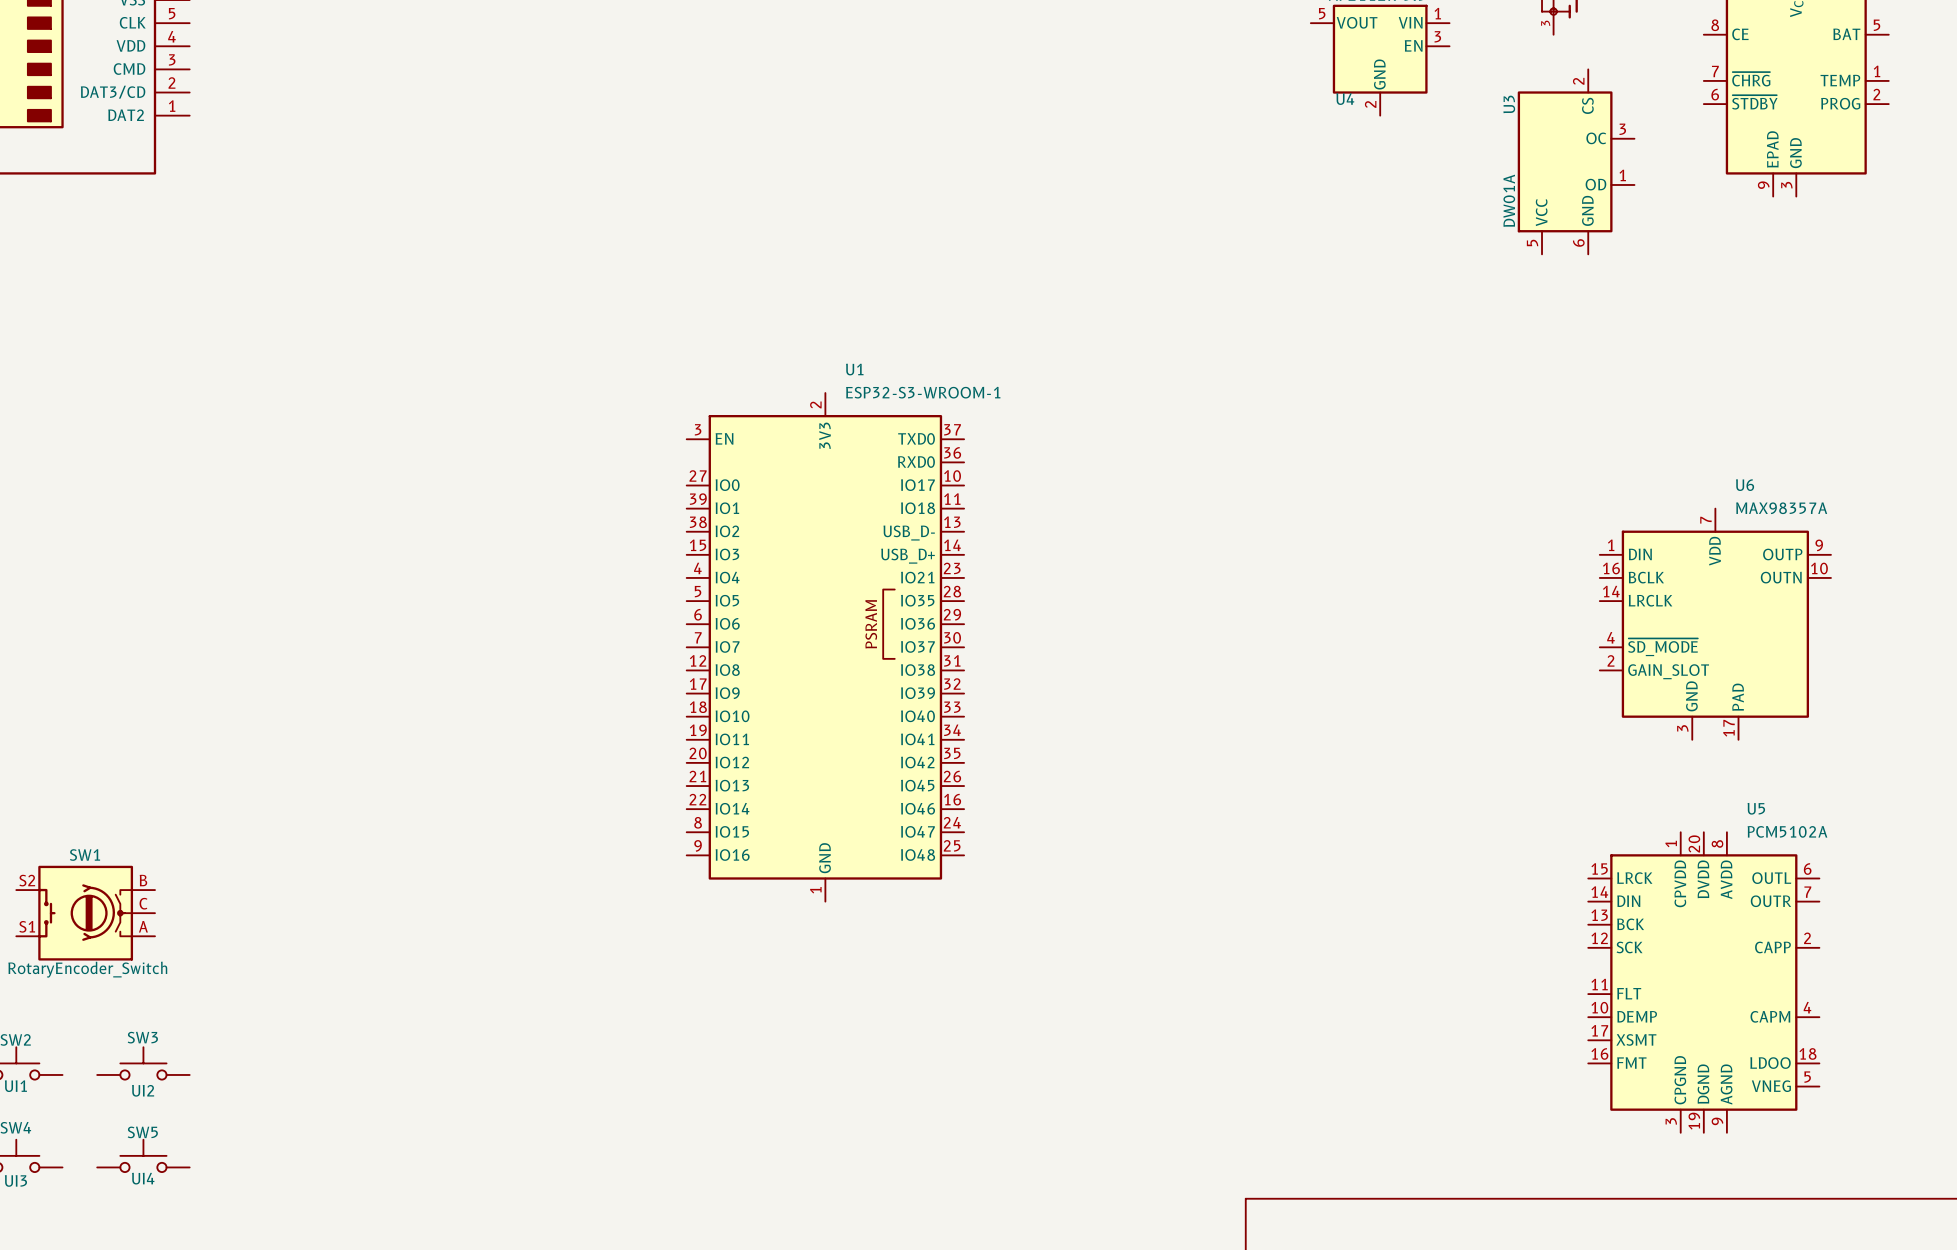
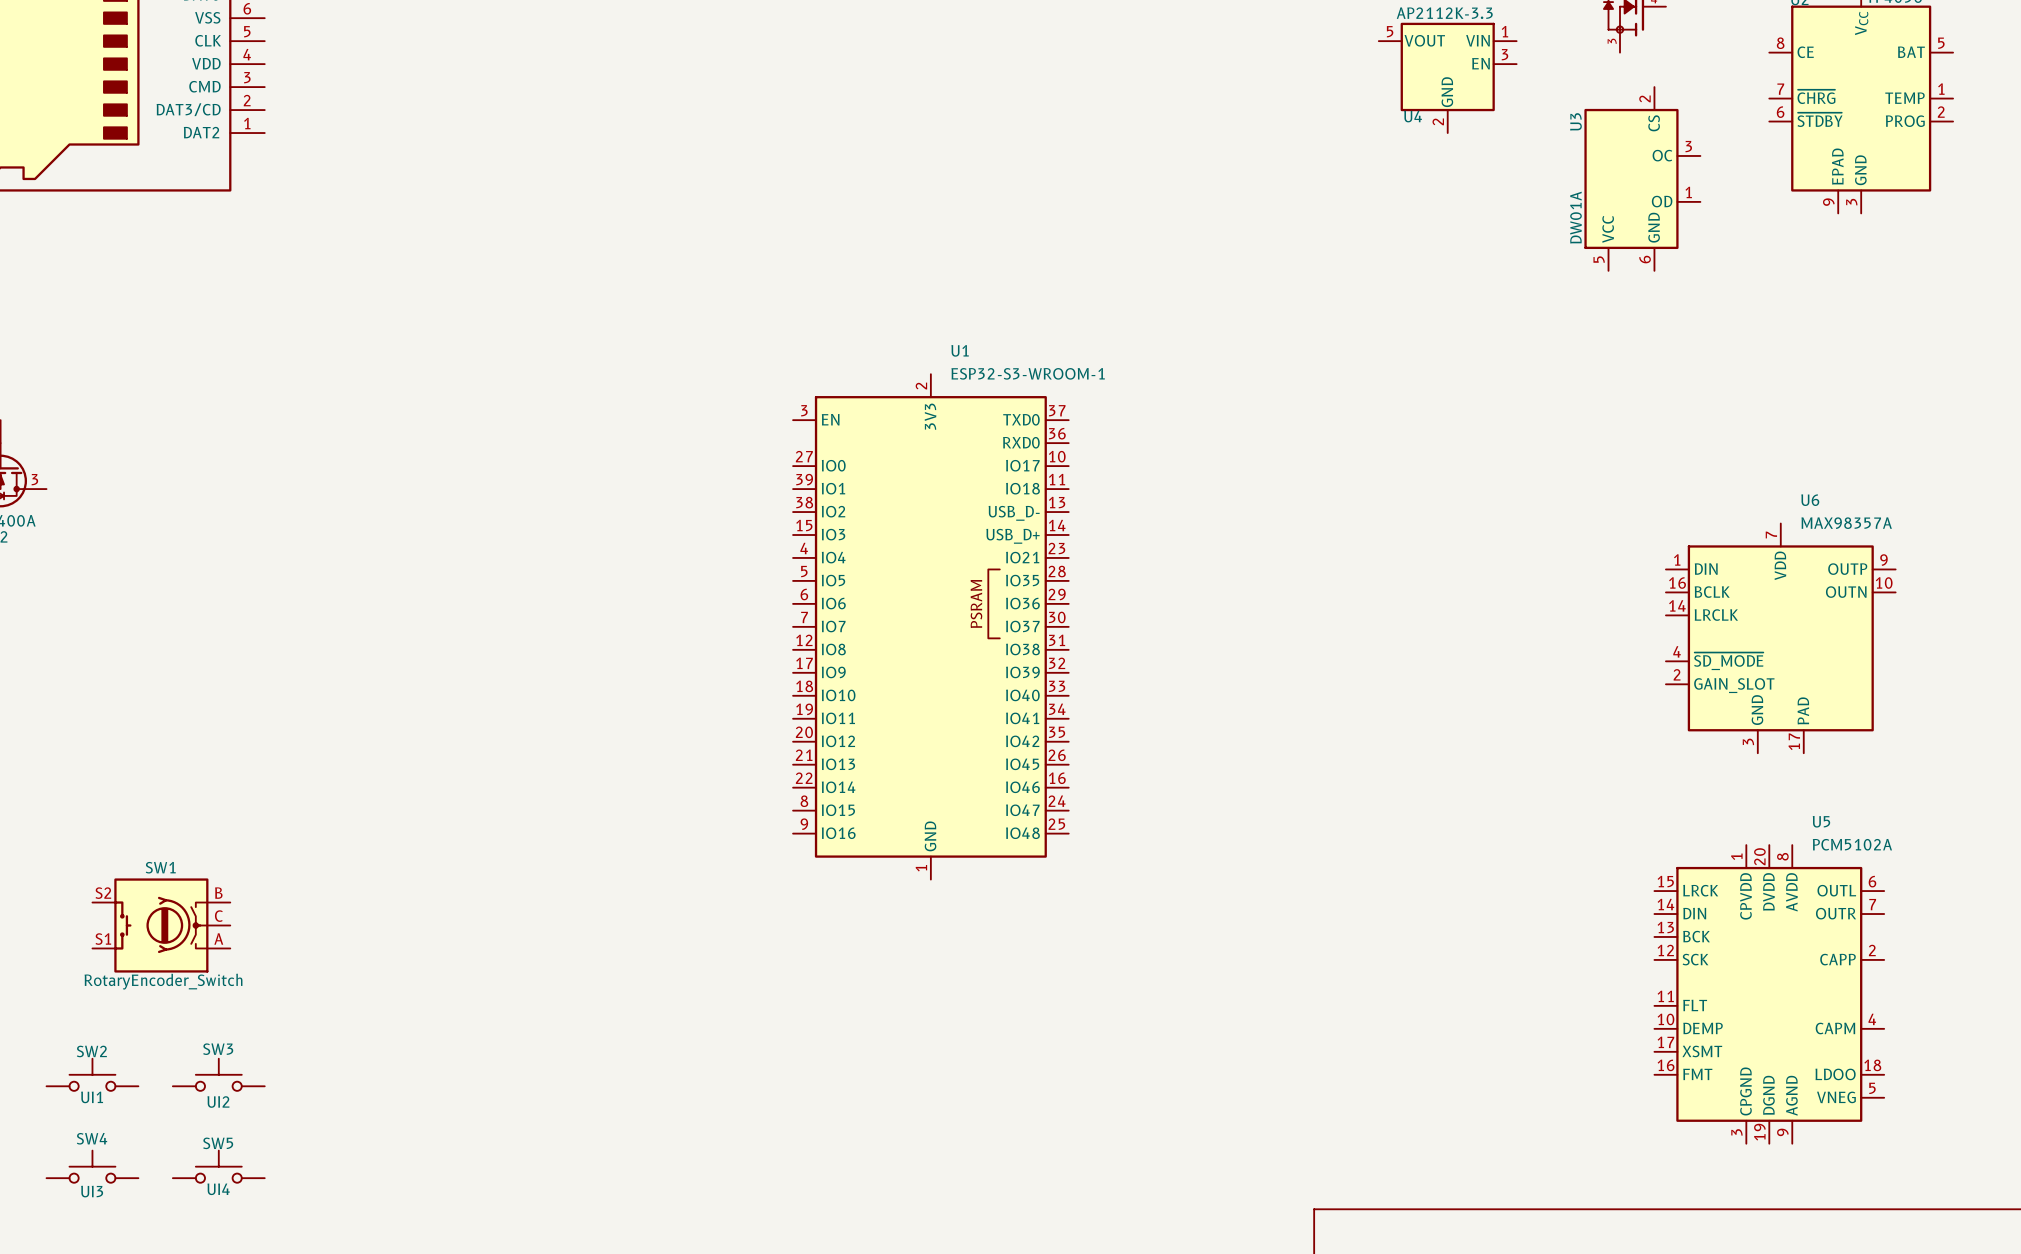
U1 position: (825, 647) -> (930, 626)

